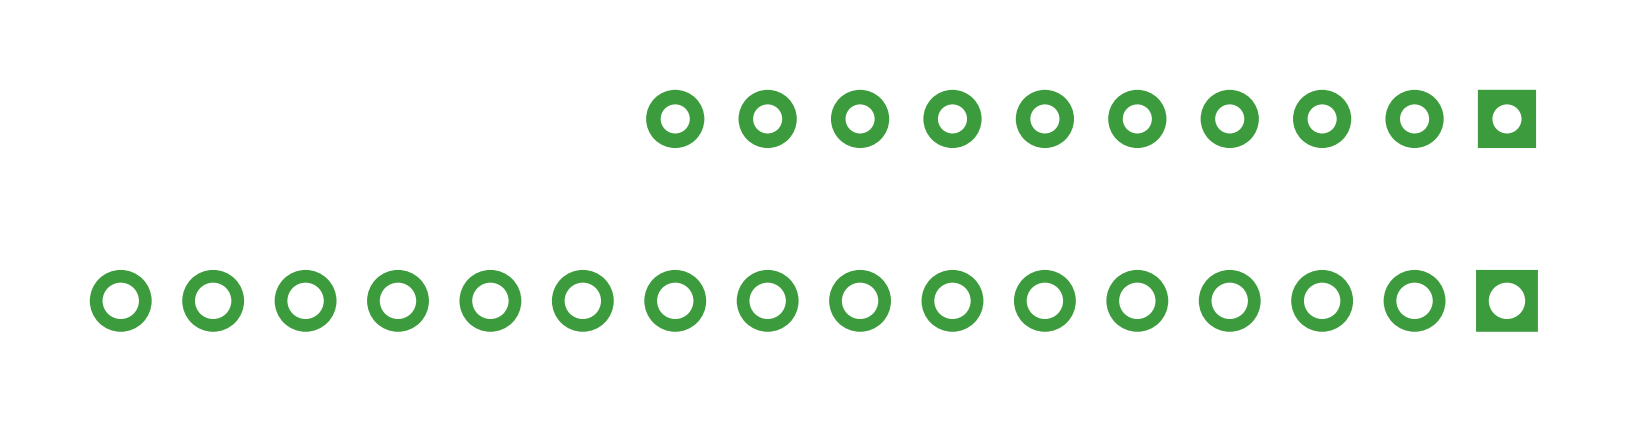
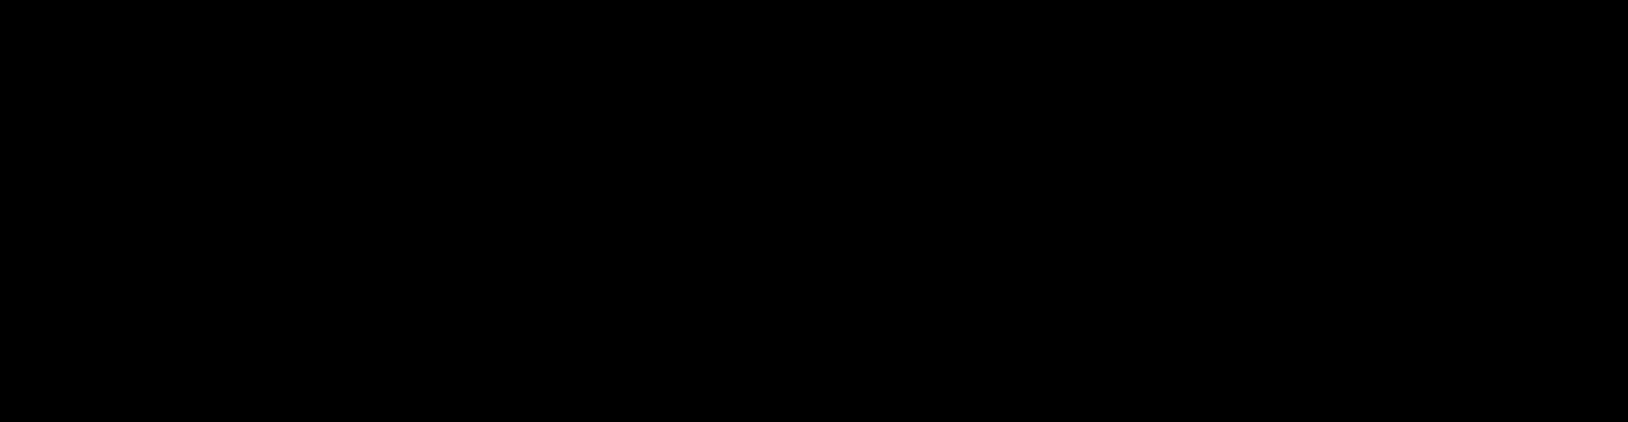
part: (1091, 118) -> none
part: (813, 300) -> none

